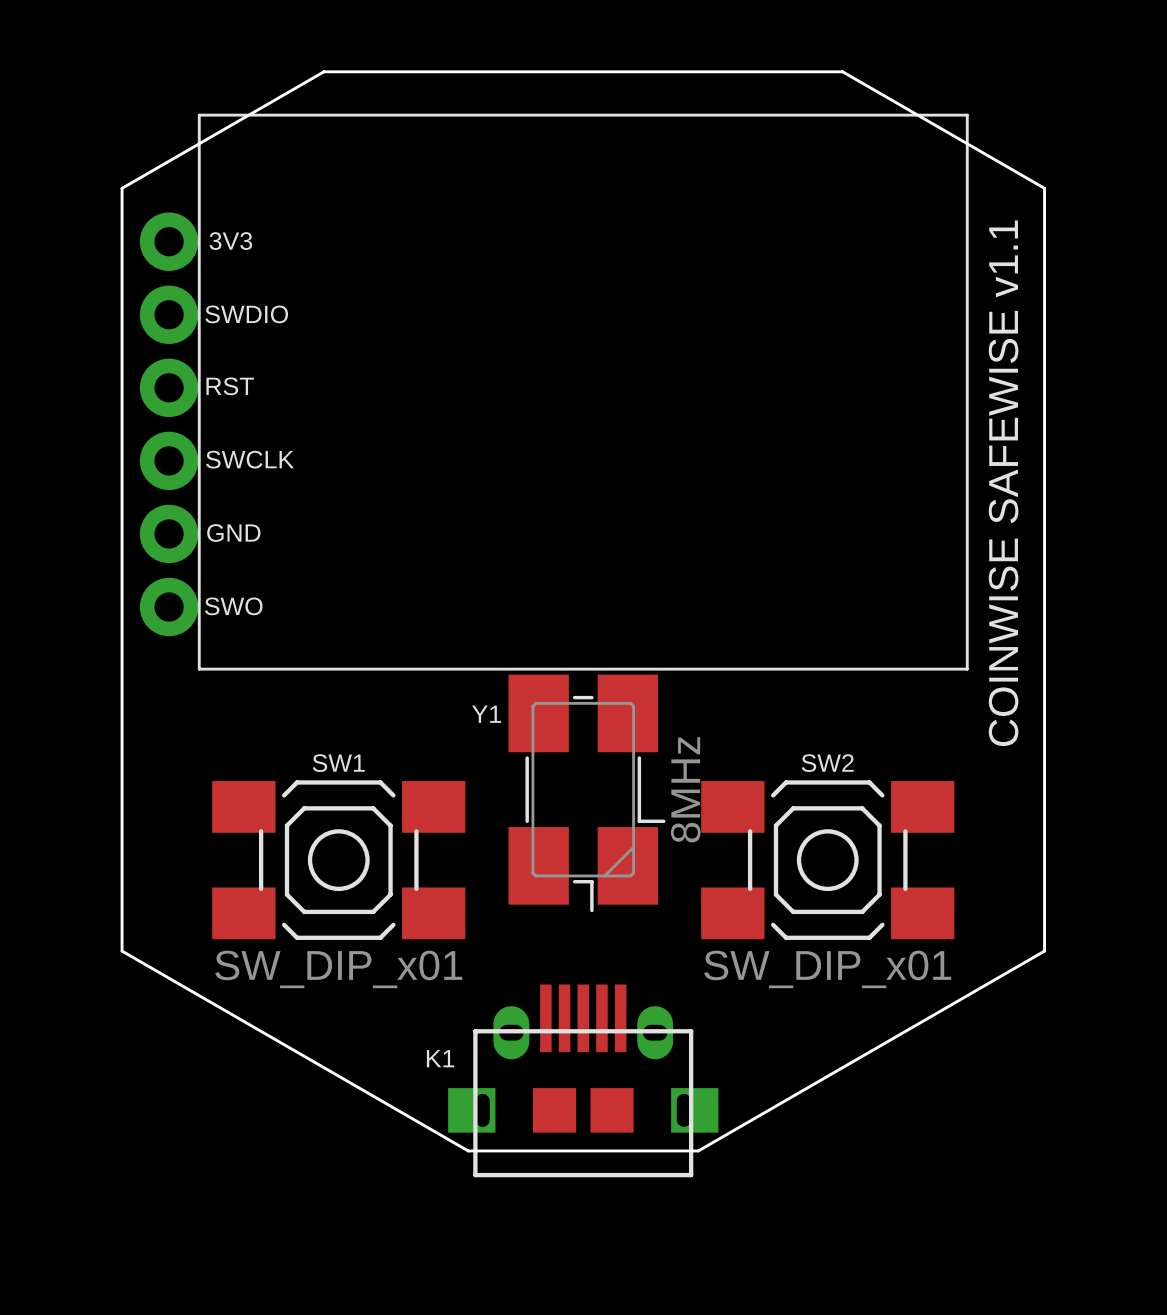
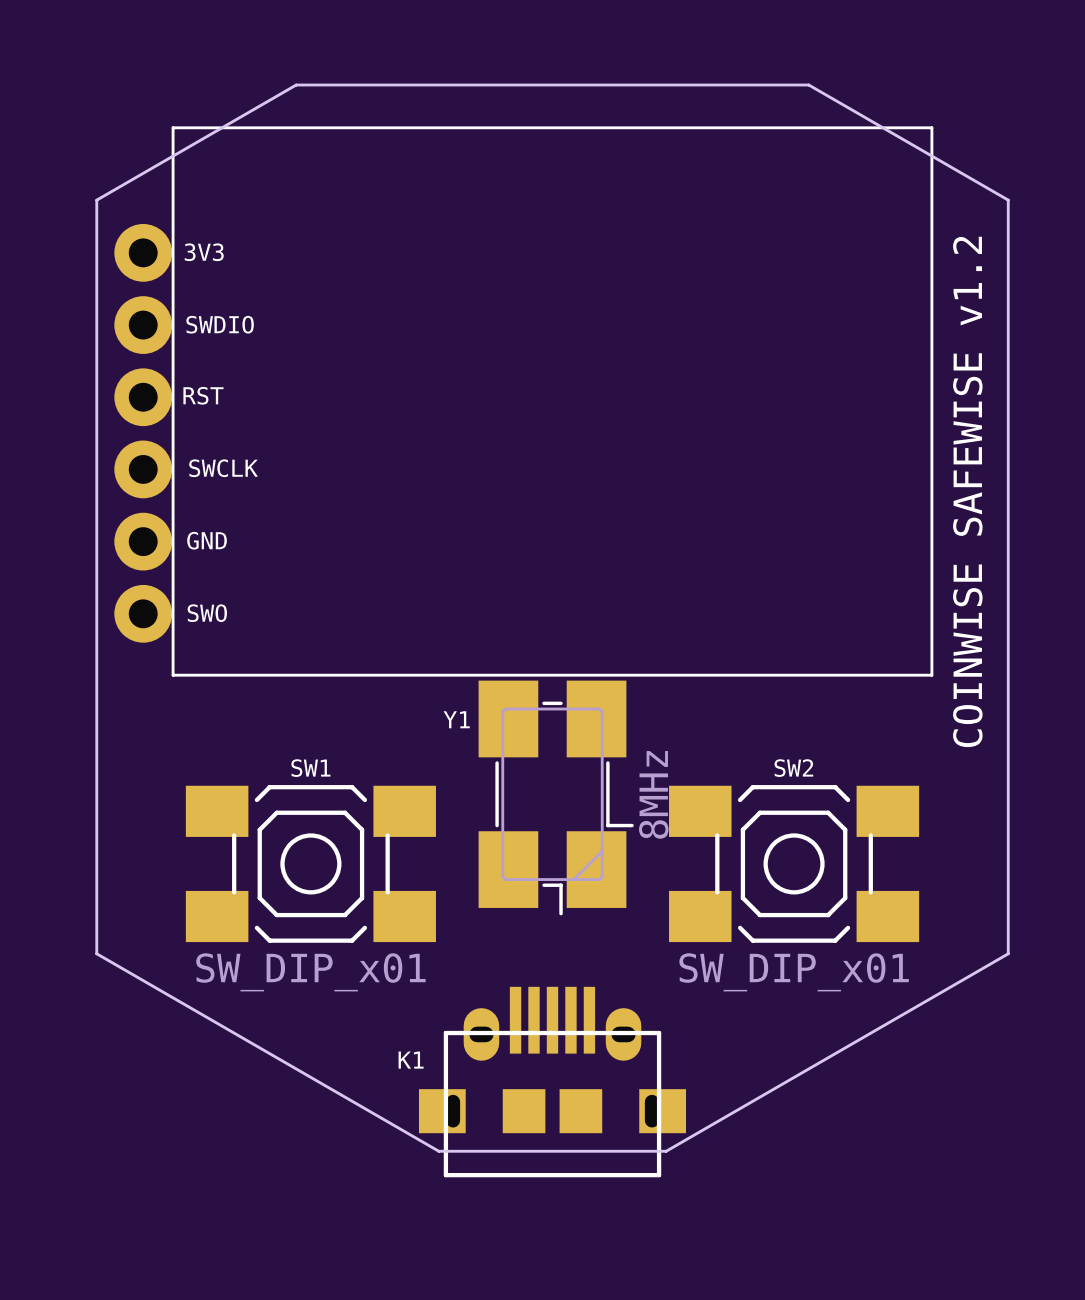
text: COINWISE SAFEWISE v1.1 (1003, 483) -> COINWISE SAFEWISE v1.2 (967, 491)

